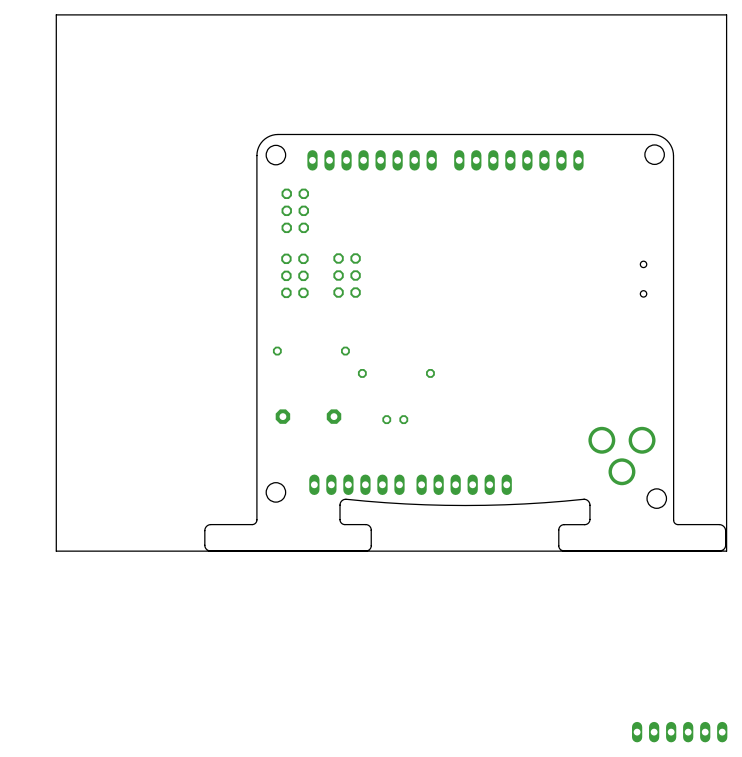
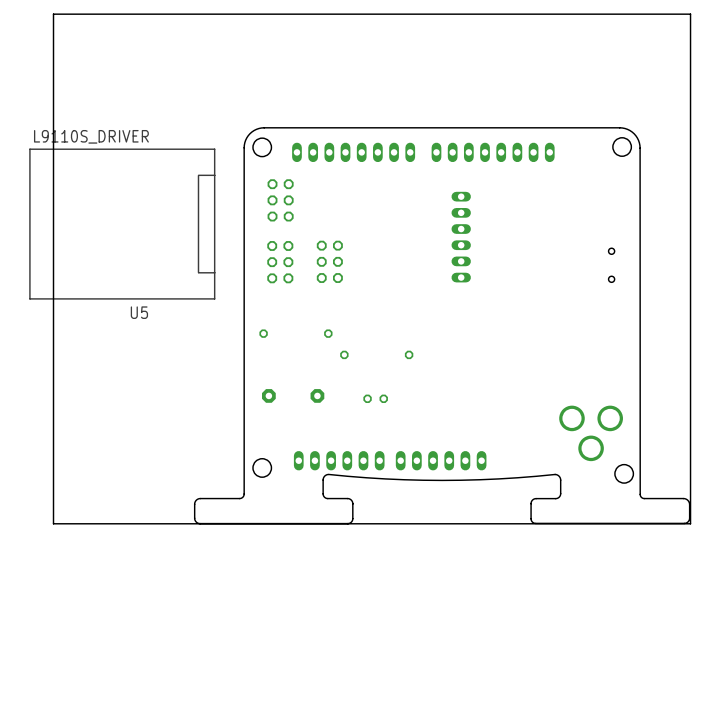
U5: none -> L9110S_DRIVER (122, 224)
part: none -> (461, 237)
part: (679, 732) -> none

